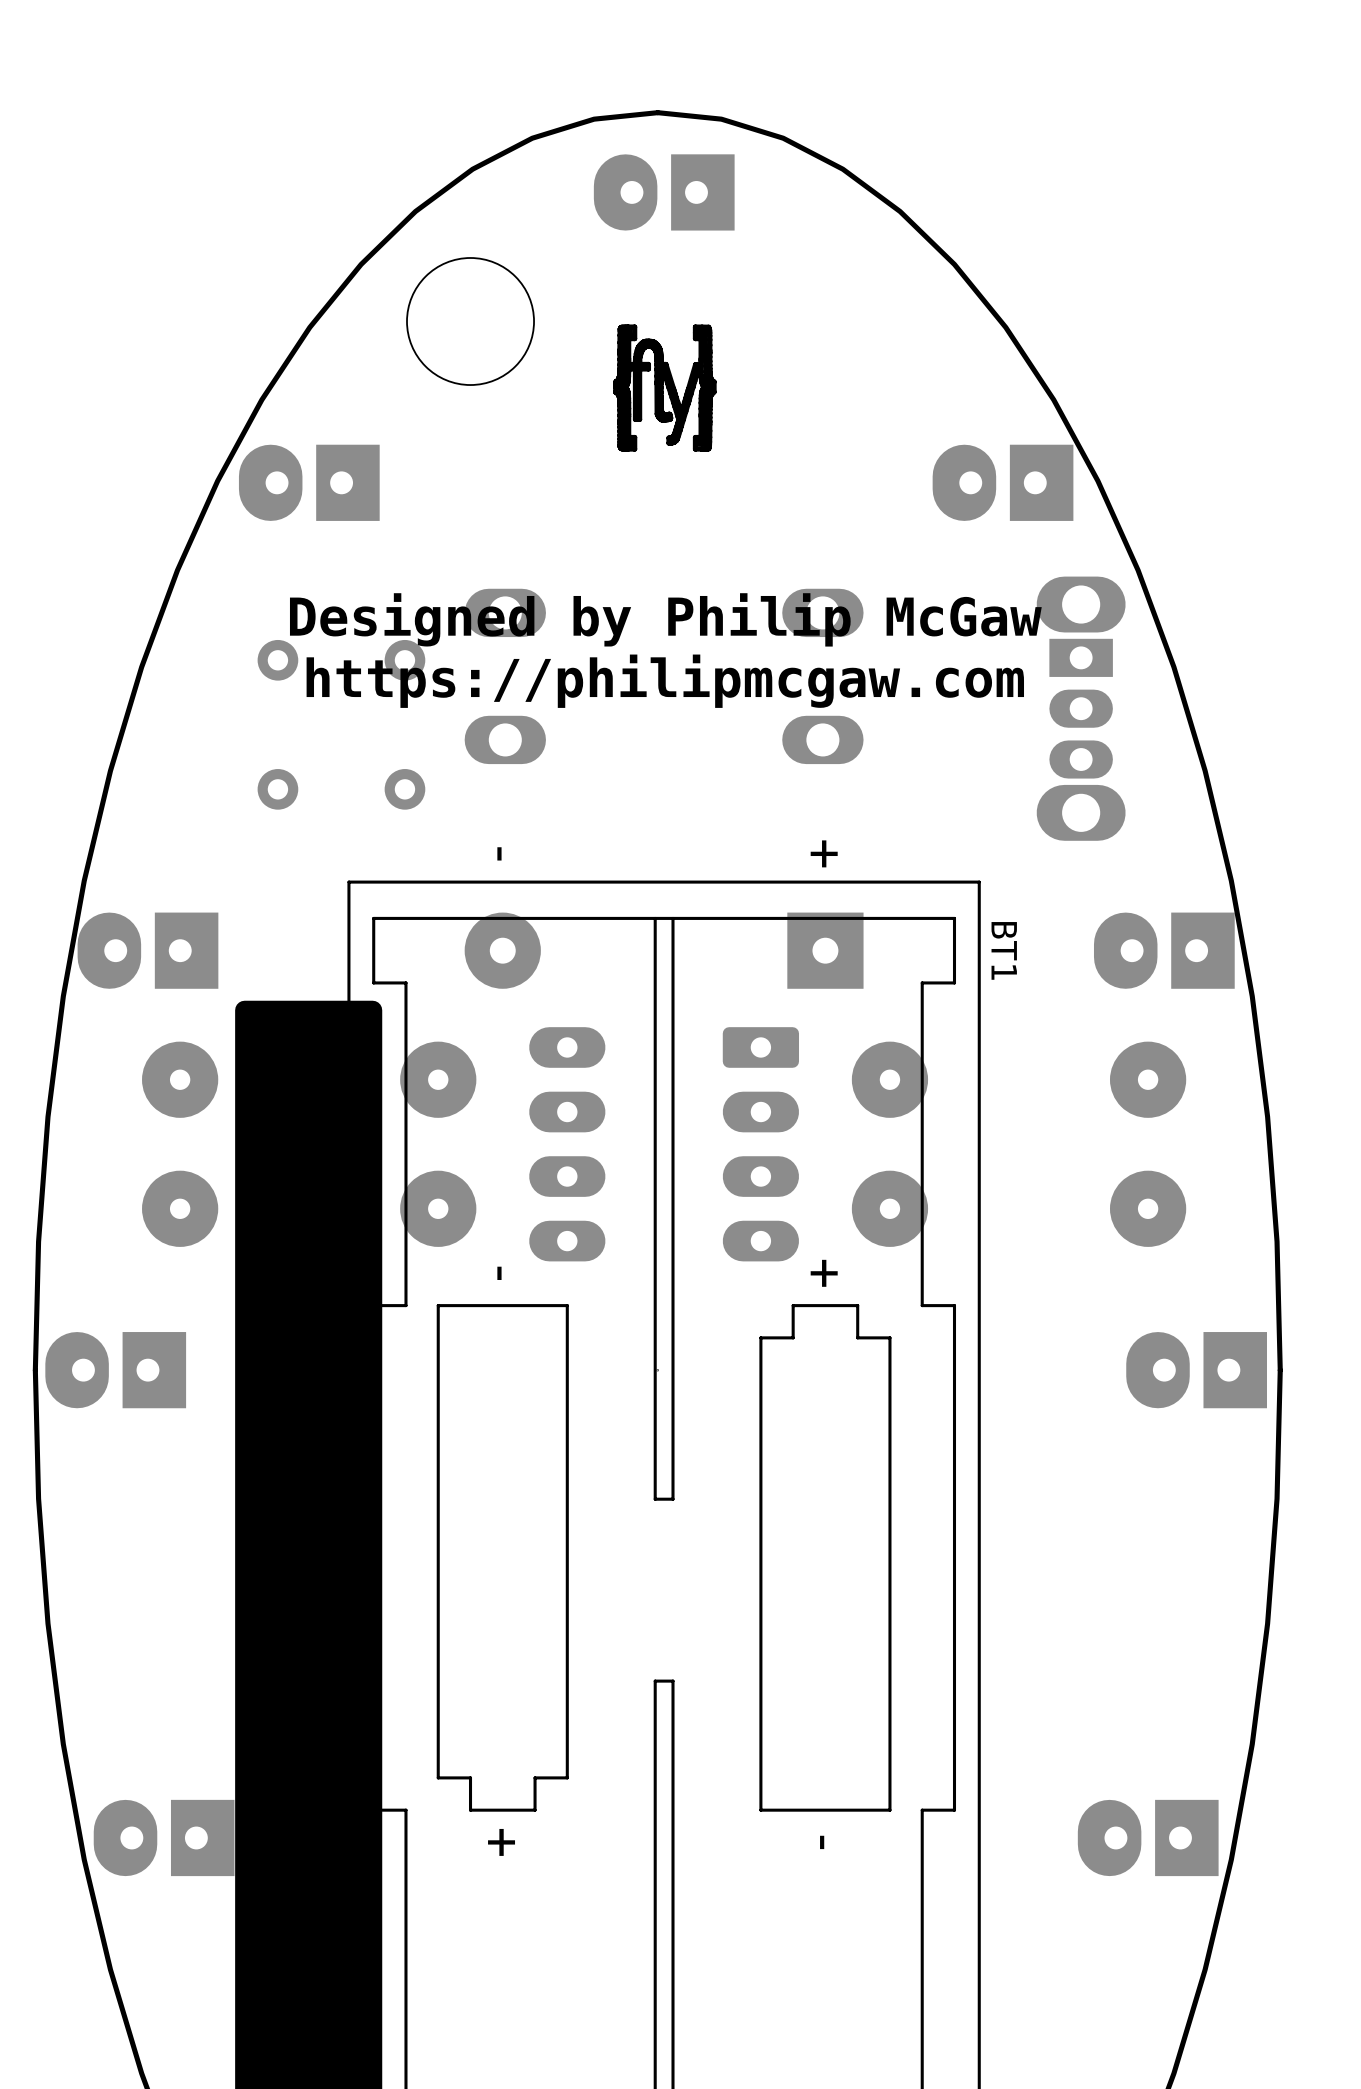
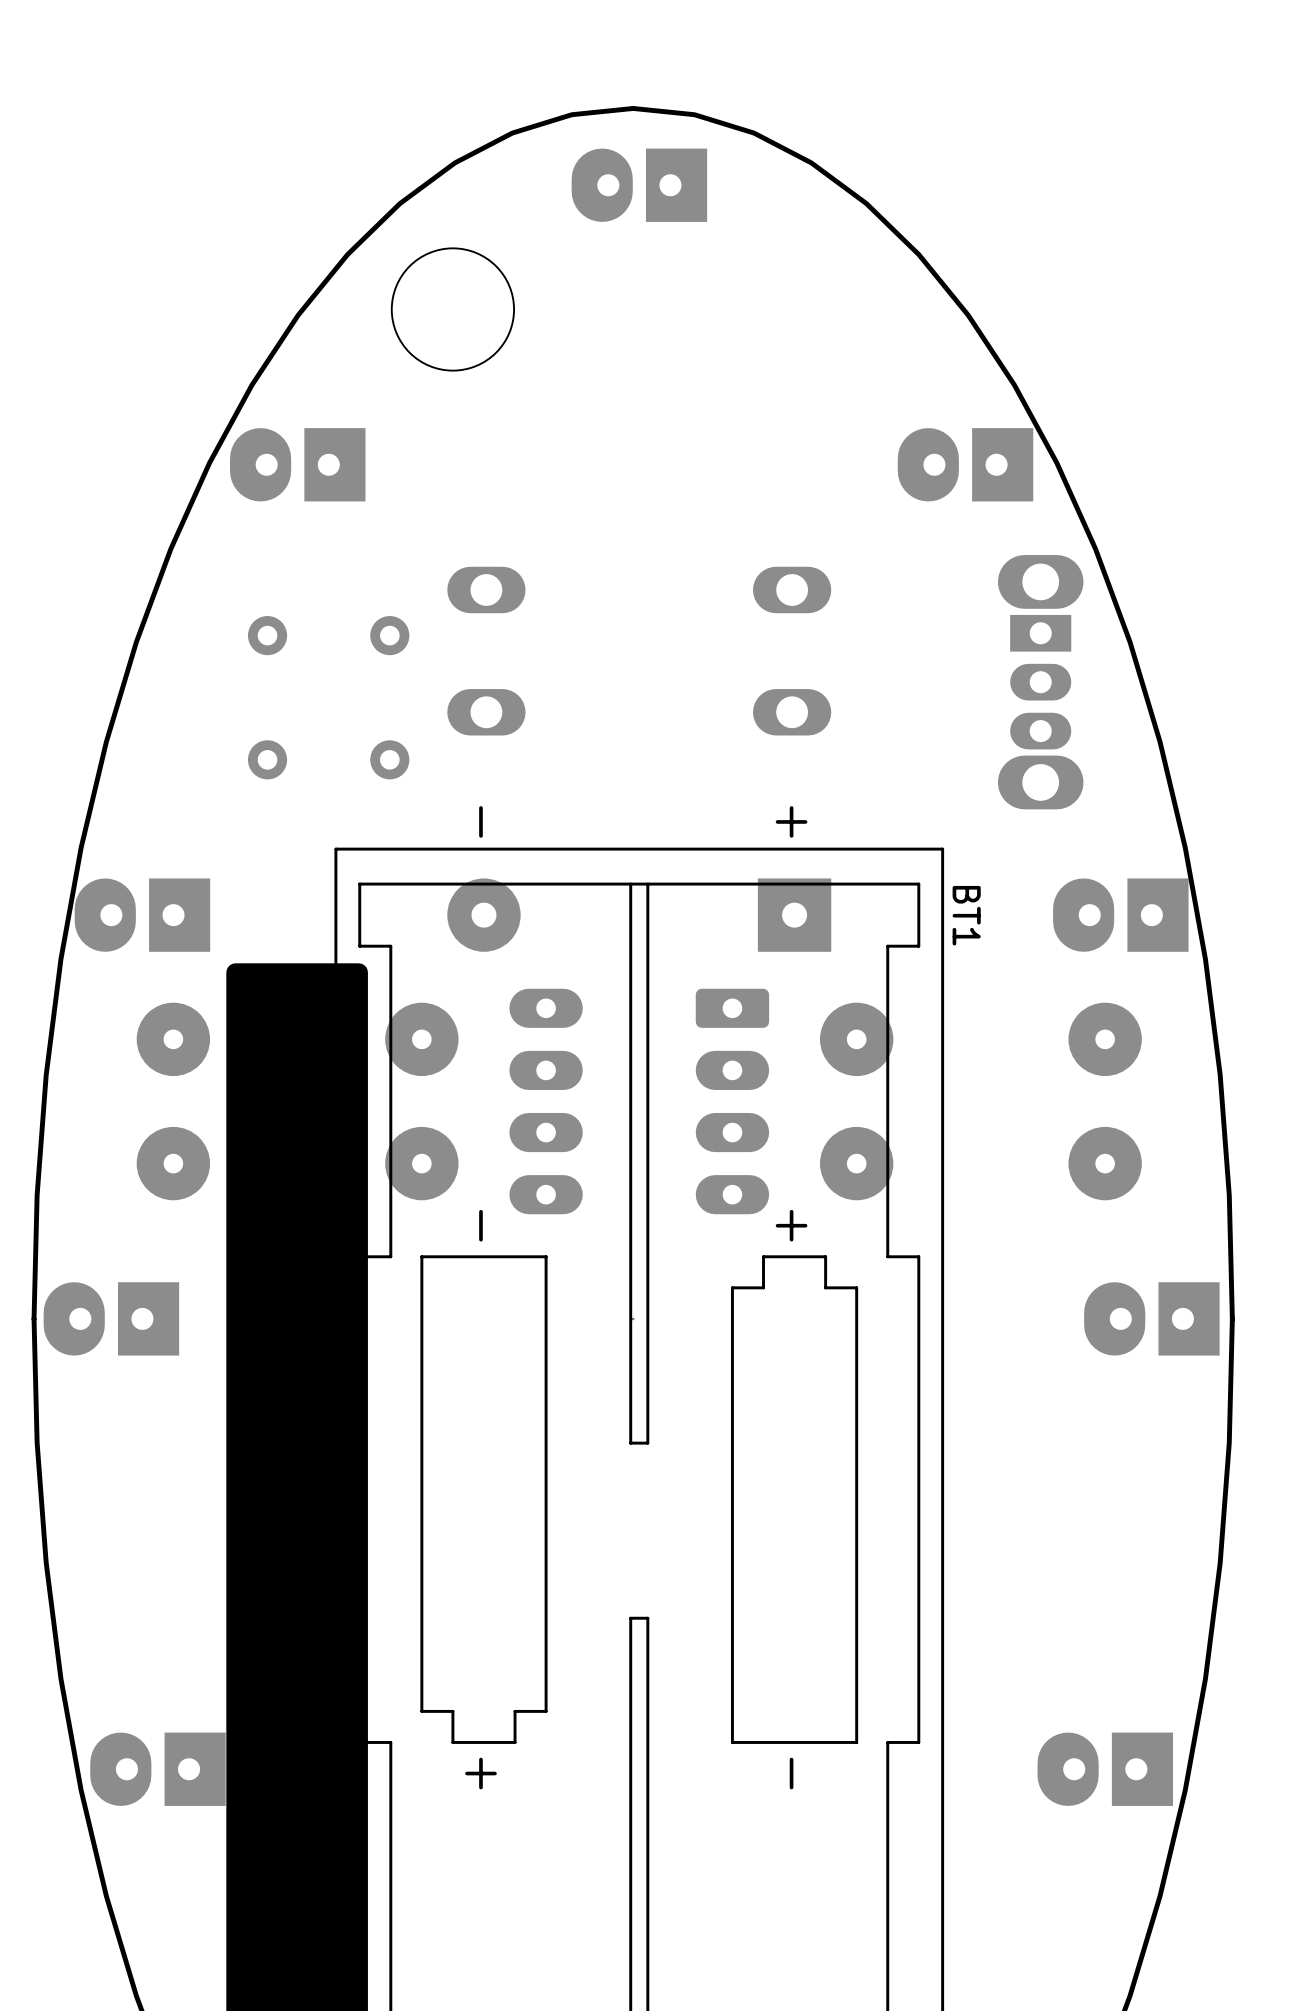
drawing: [613, 324, 717, 452] -> none
text: Designed by Philip McGaw (665, 619) -> none
text: https://philipmcgaw.com (665, 681) -> none

